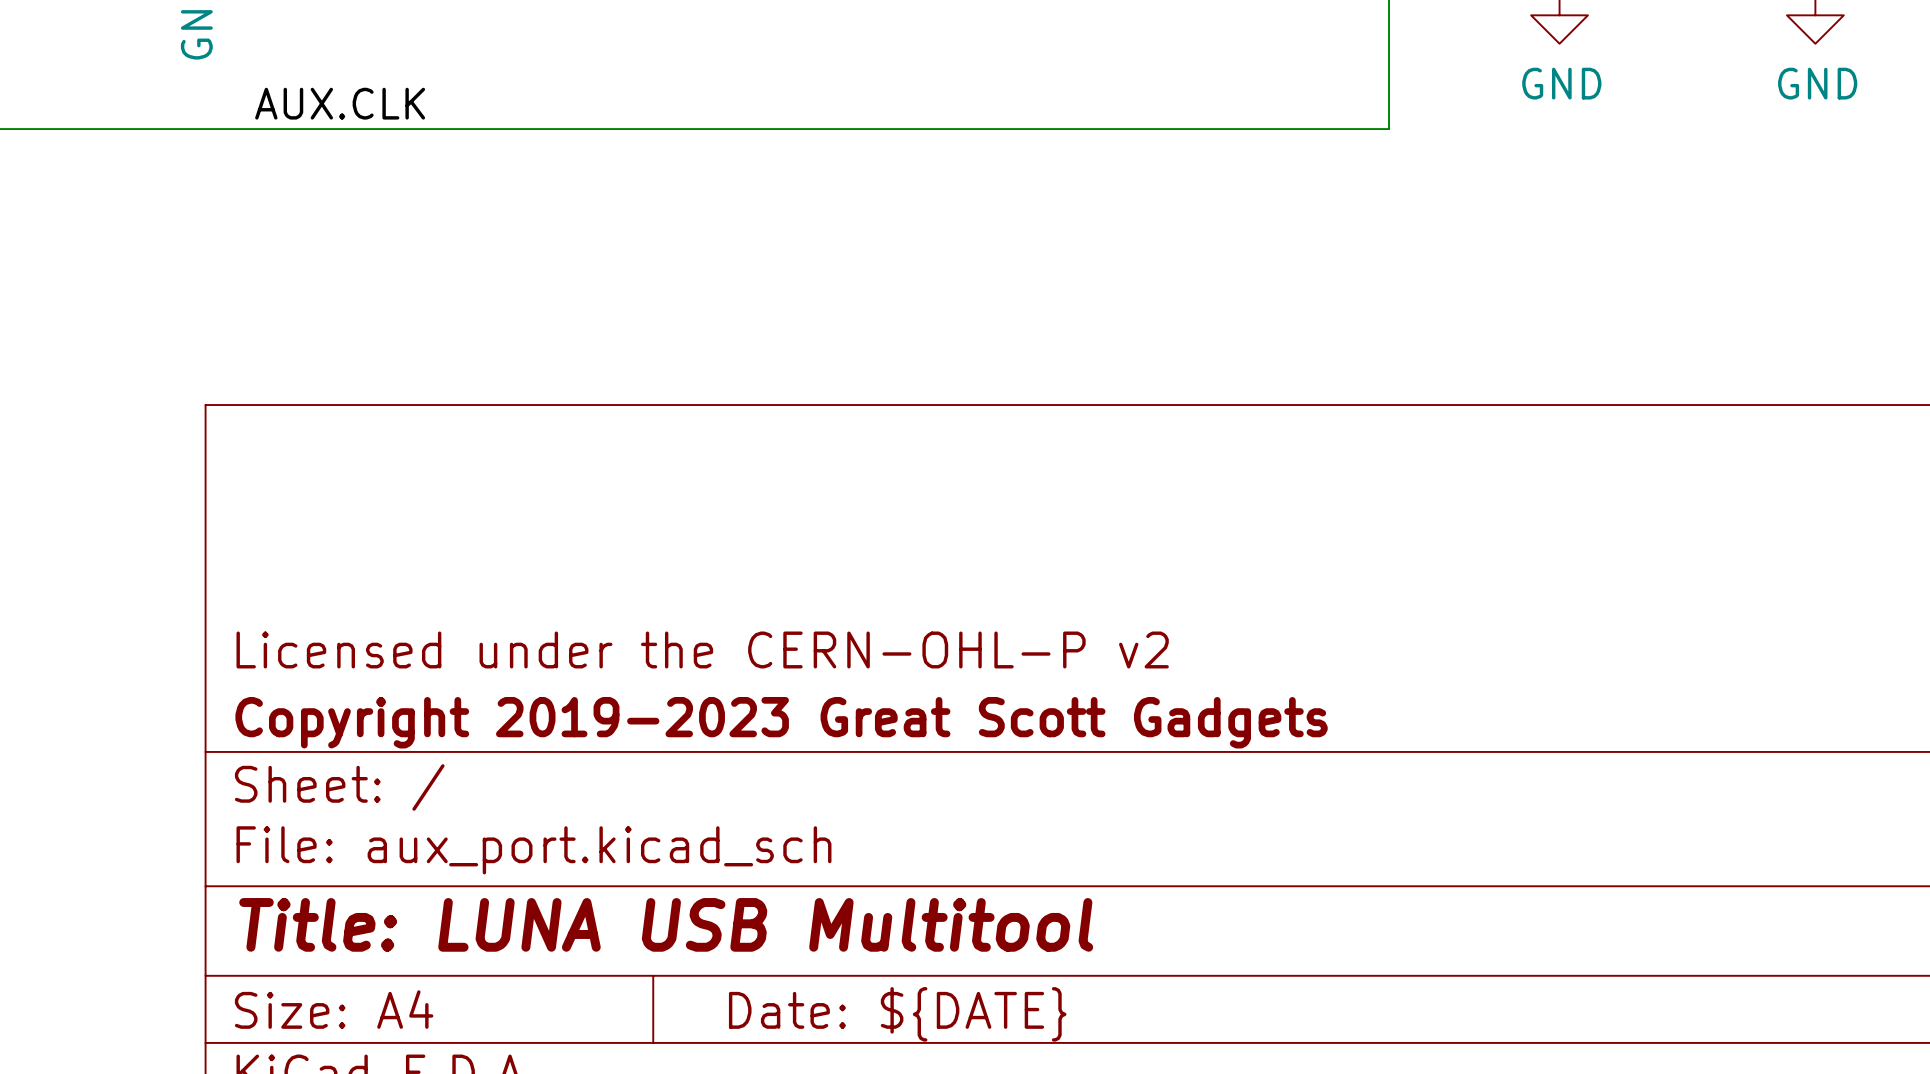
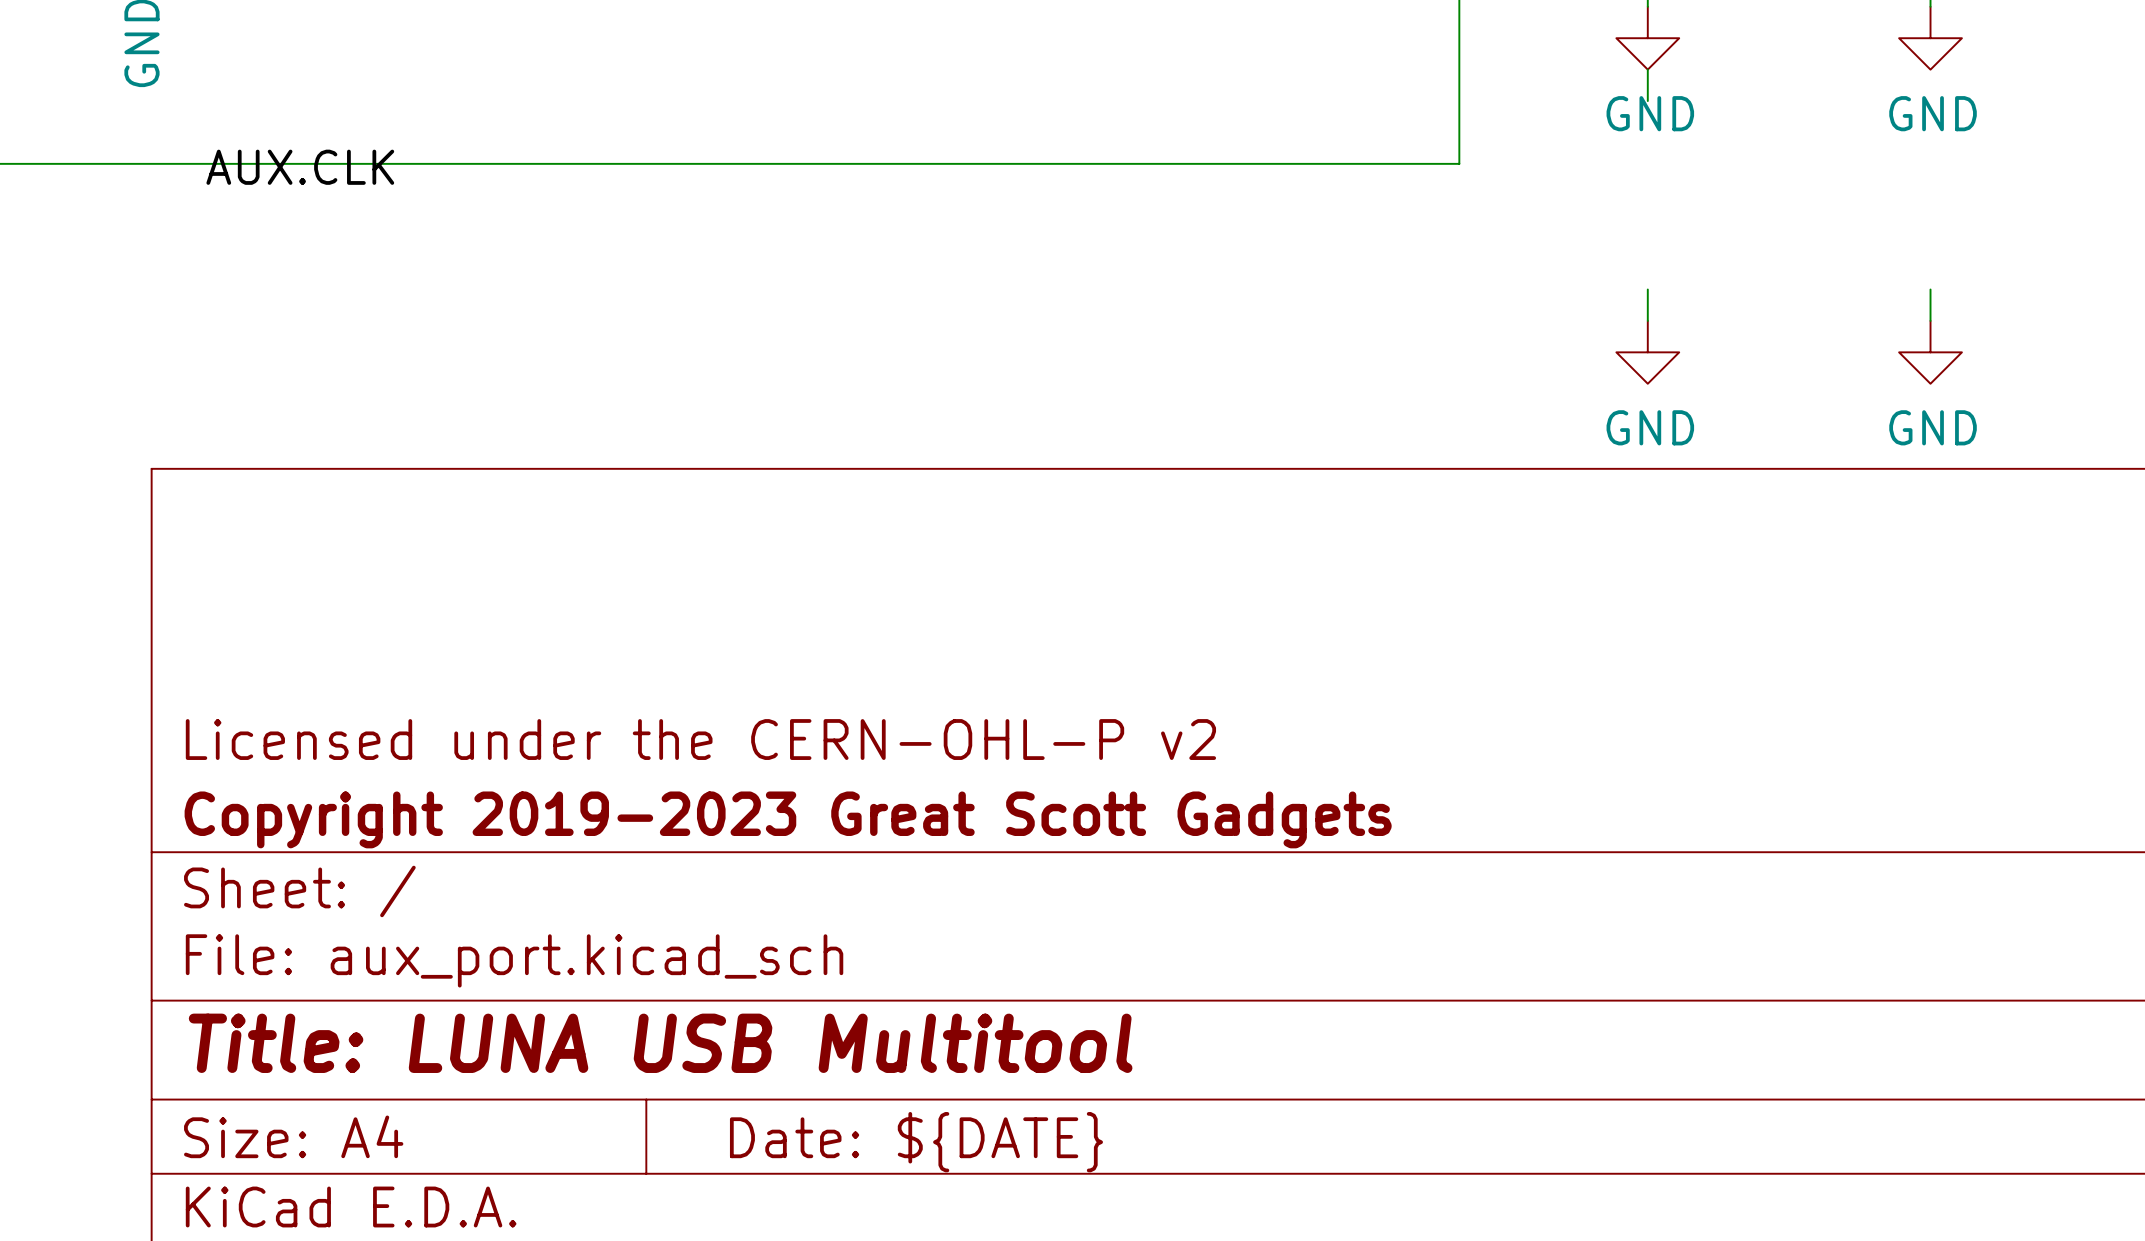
wire: none -> (1647, 69) (1647, 101)
label position: AUX.CLK (340, 103) -> AUX.CLK (300, 167)
wire: none -> (1647, 289) (1647, 320)
wire: none -> (1930, 289) (1930, 320)
power symbol: none -> GND (1647, 352)
power symbol: none -> GND (1930, 352)

